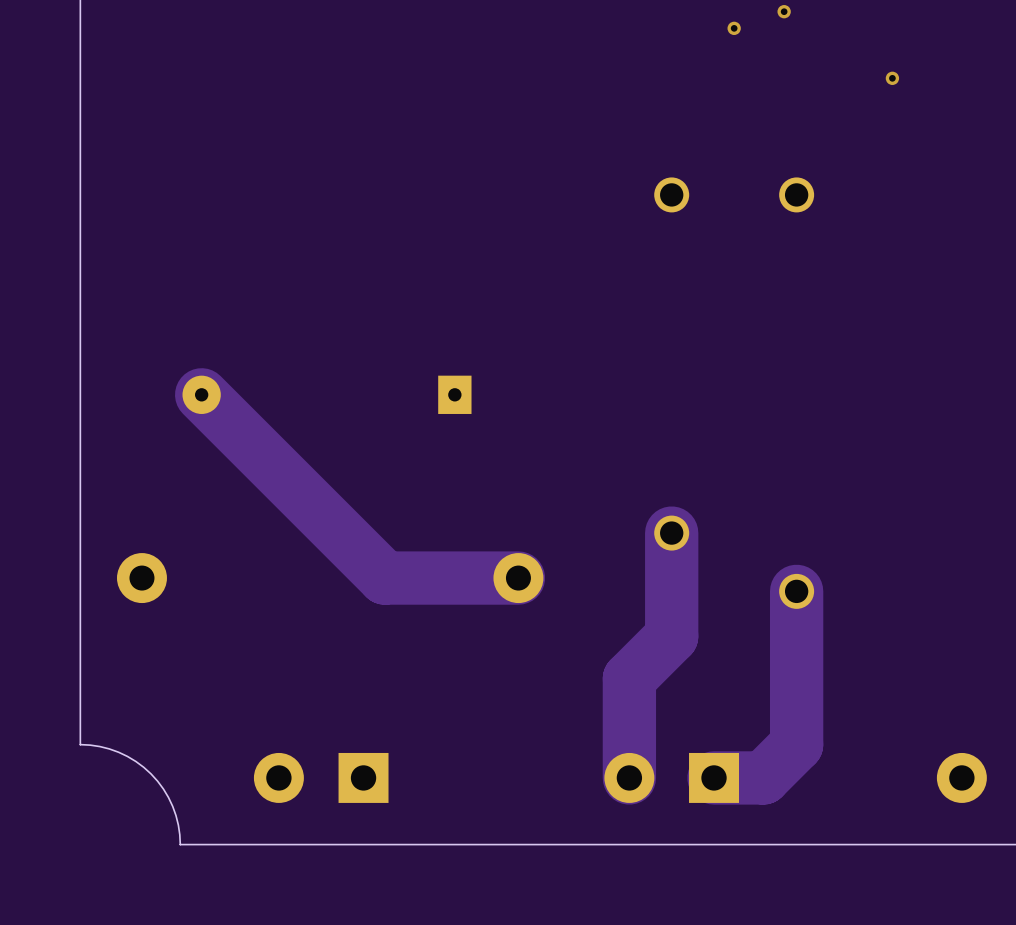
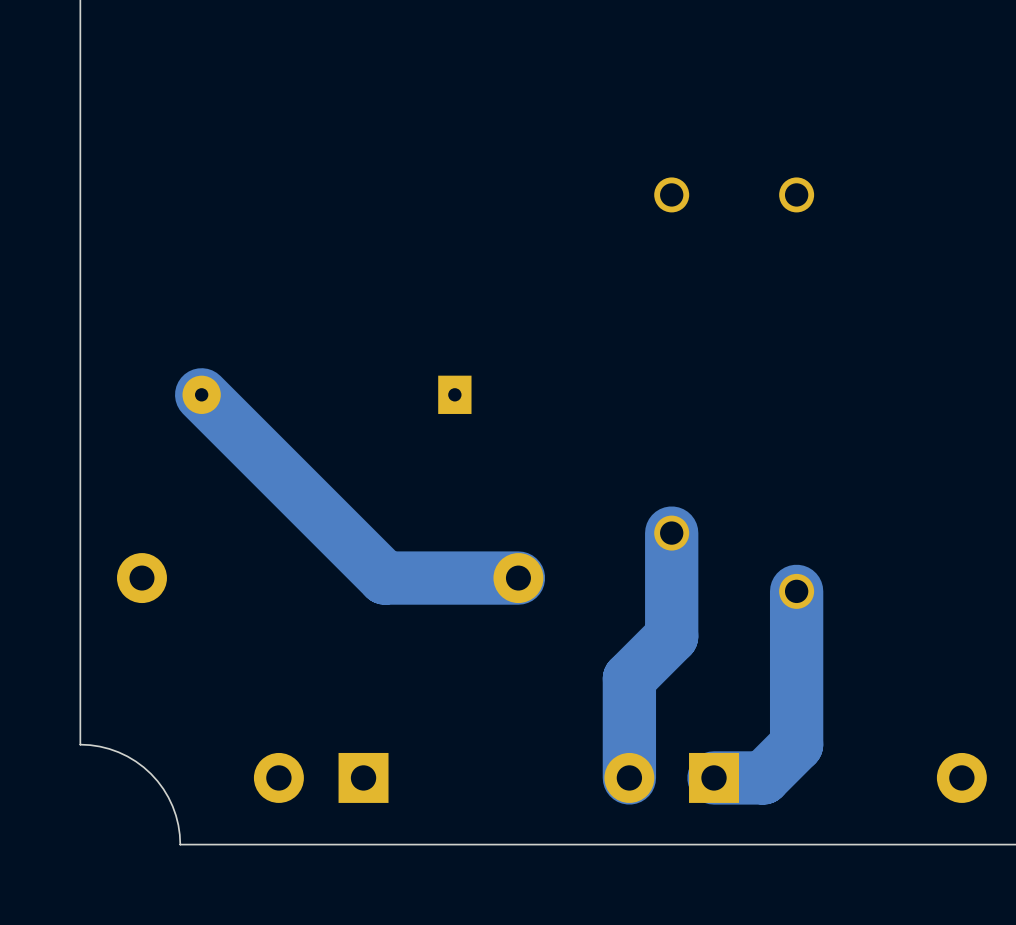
via: (784, 11) -> none
via: (734, 28) -> none
via: (892, 78) -> none

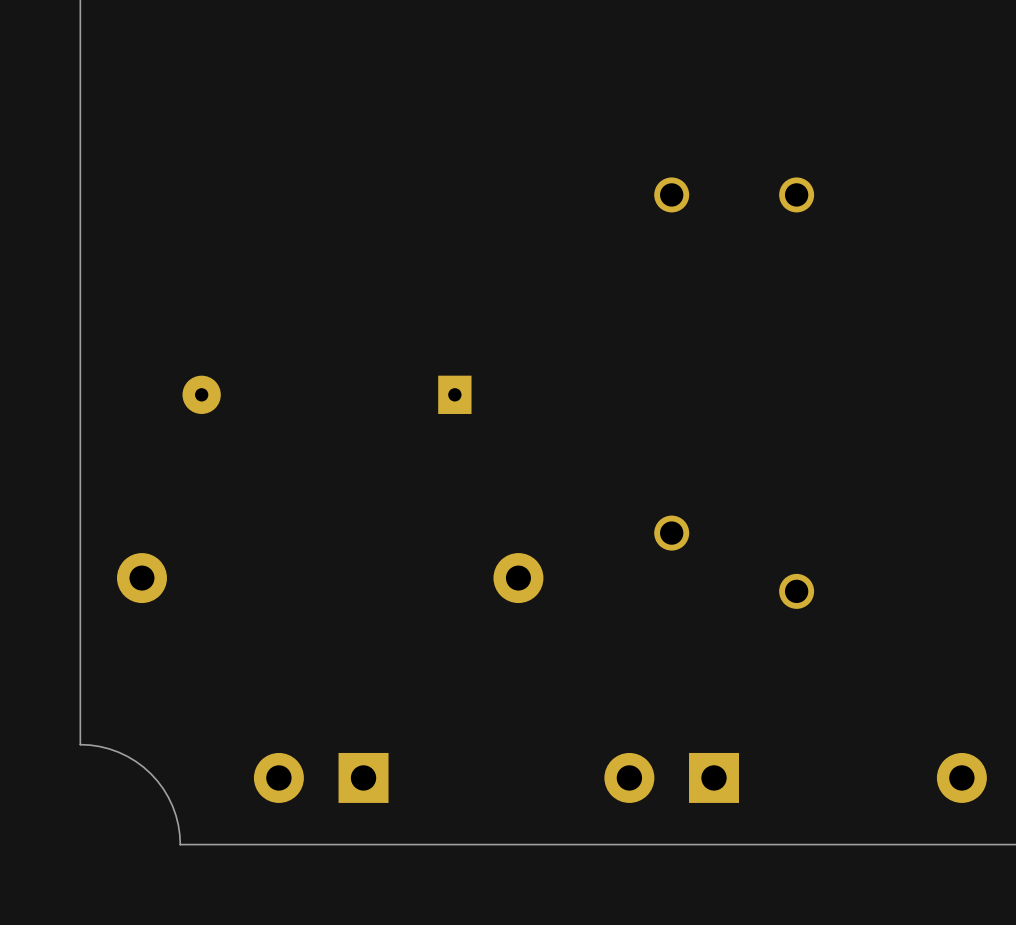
track: (201, 394) (384, 578) (518, 578) -> none
track: (671, 533) (671, 636) (629, 678) (629, 777) -> none
track: (796, 591) (796, 744) (763, 777) (714, 777) -> none

